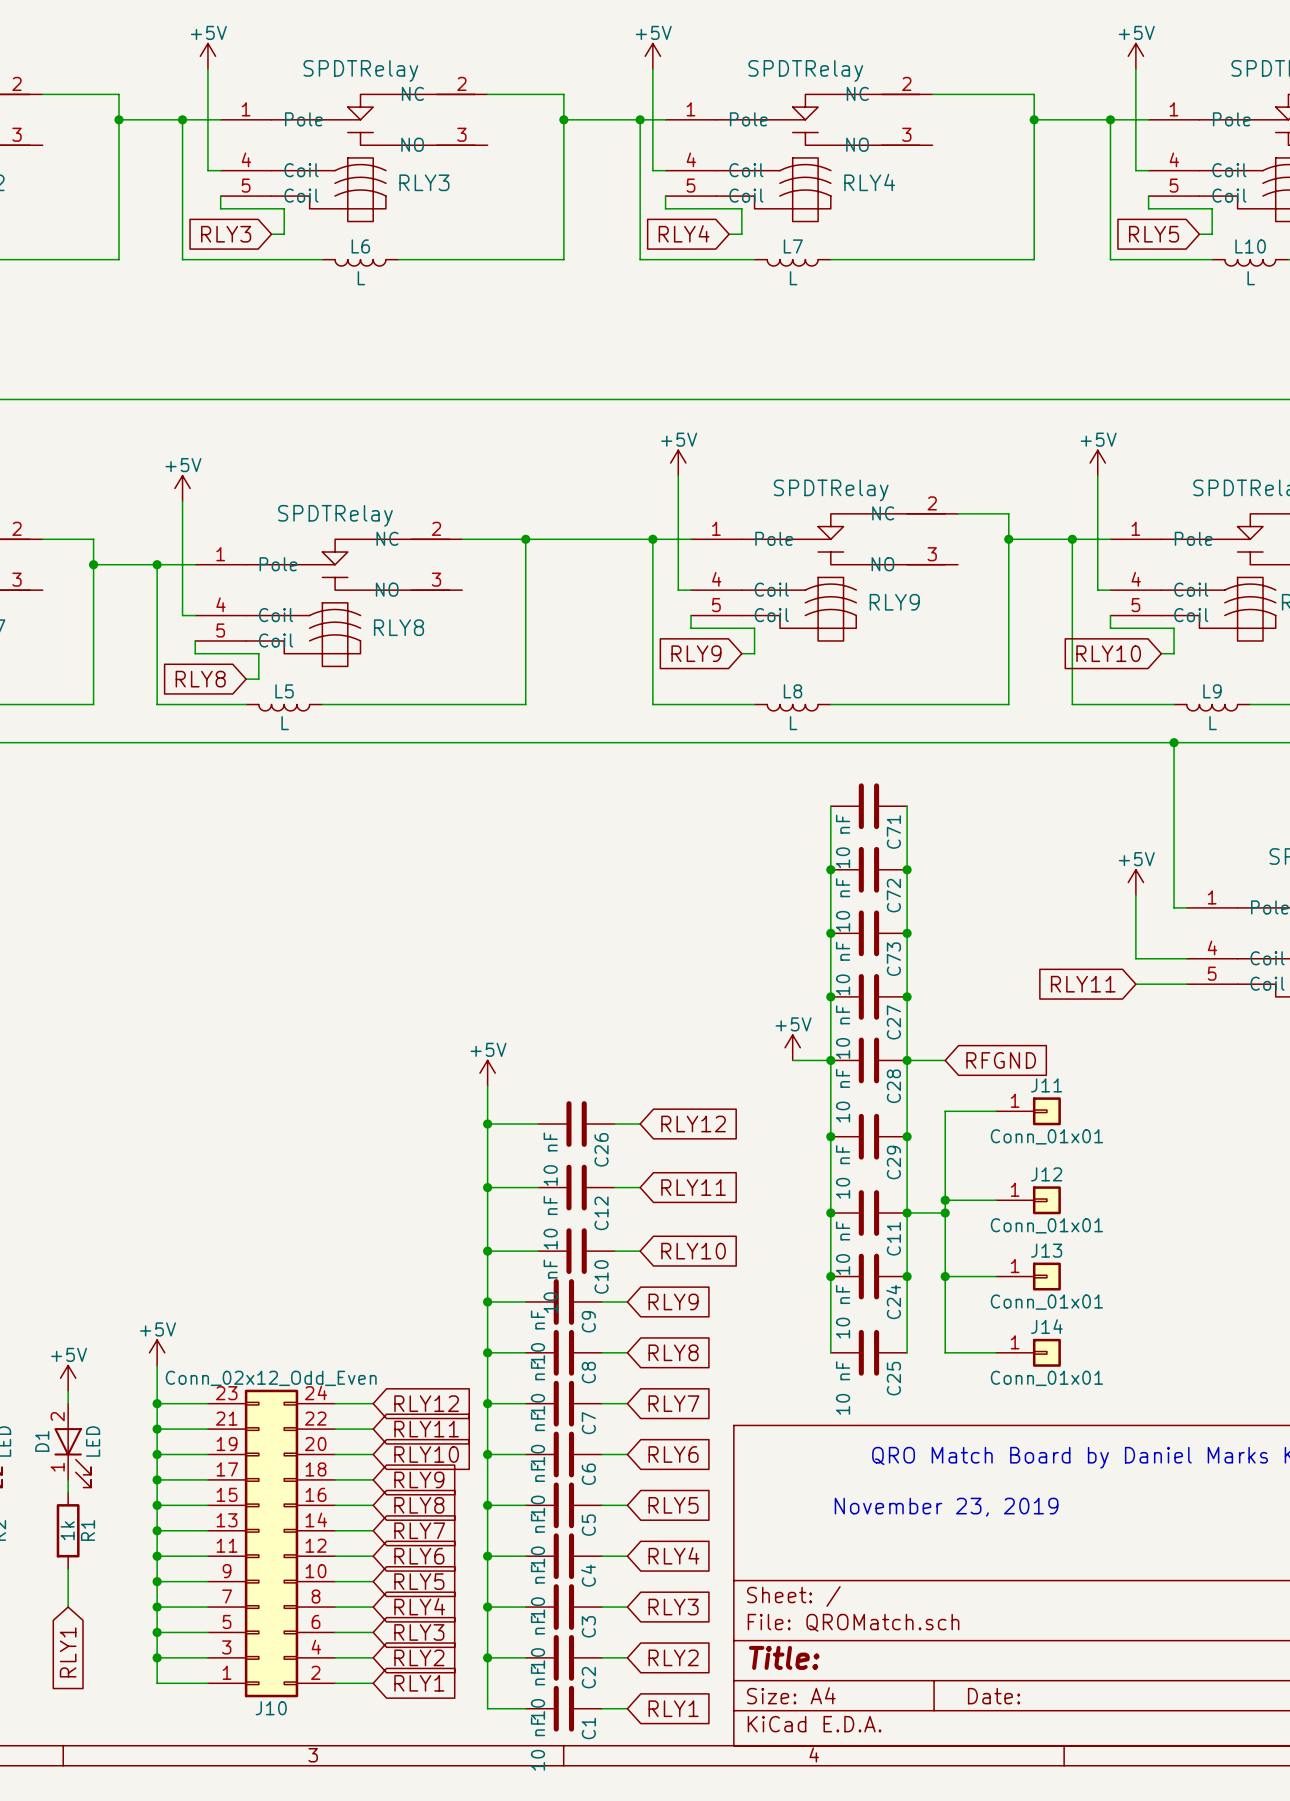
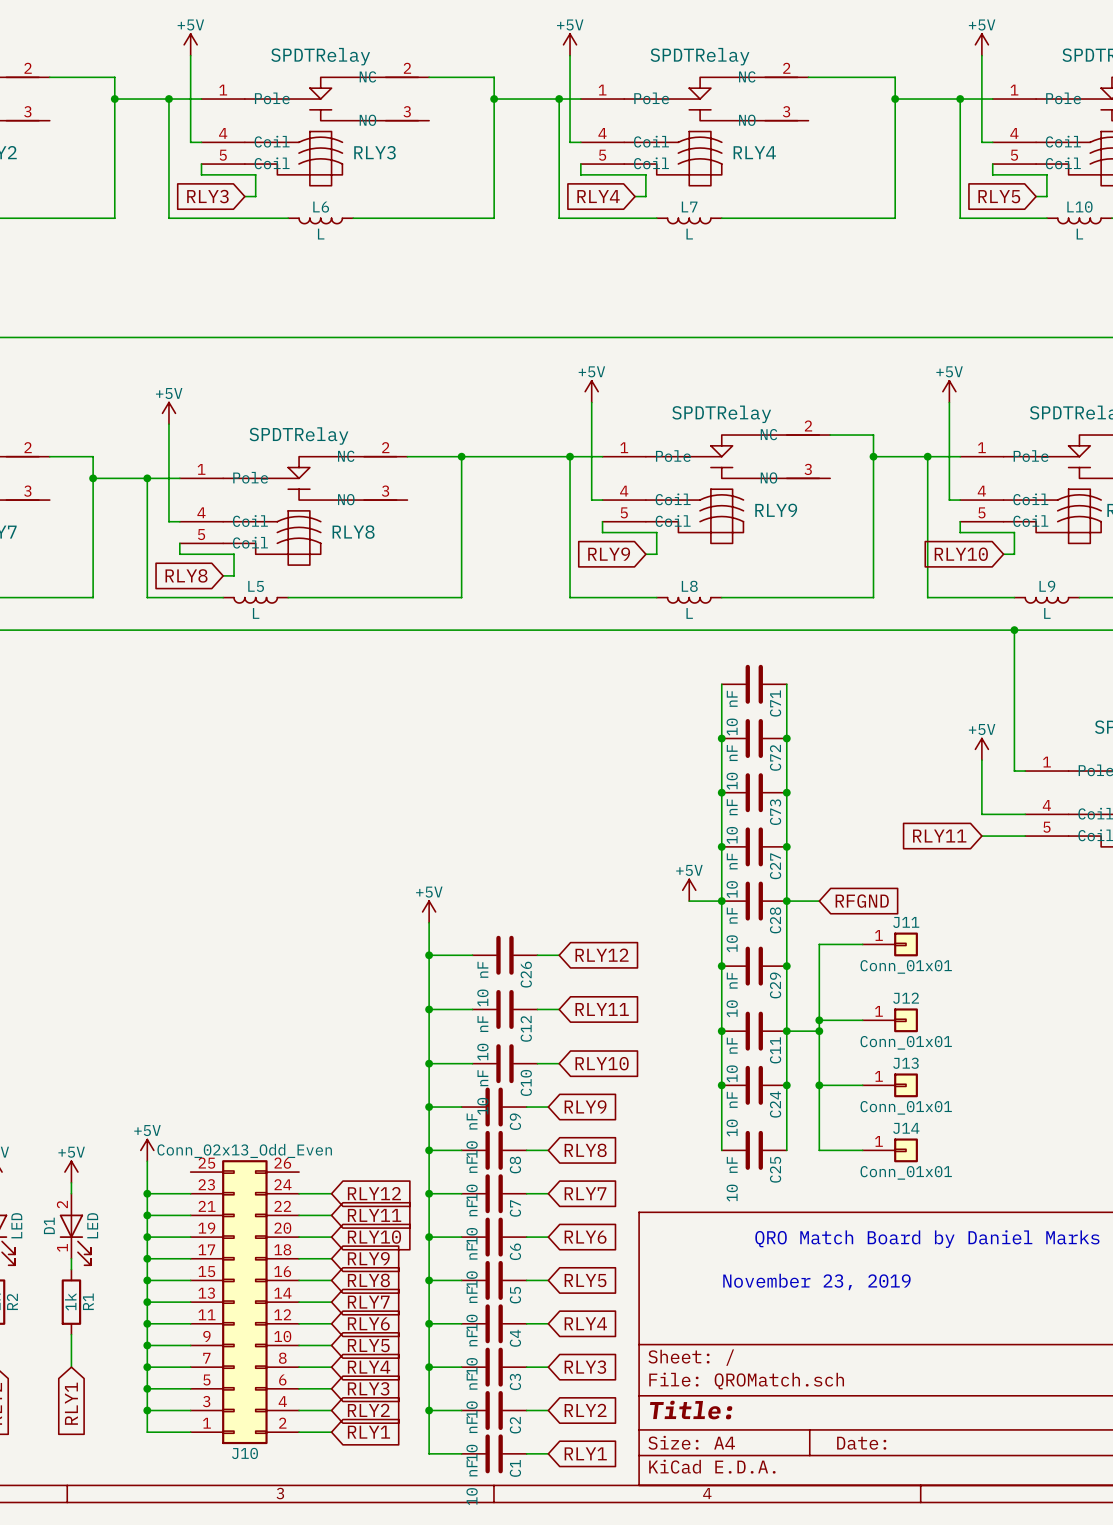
J10 value: Conn_02x12_Odd_Even (271, 1378) -> Conn_02x13_Odd_Even (244, 1150)
J10 symbol: [207, 1389, 336, 1698] -> [190, 1160, 300, 1445]

